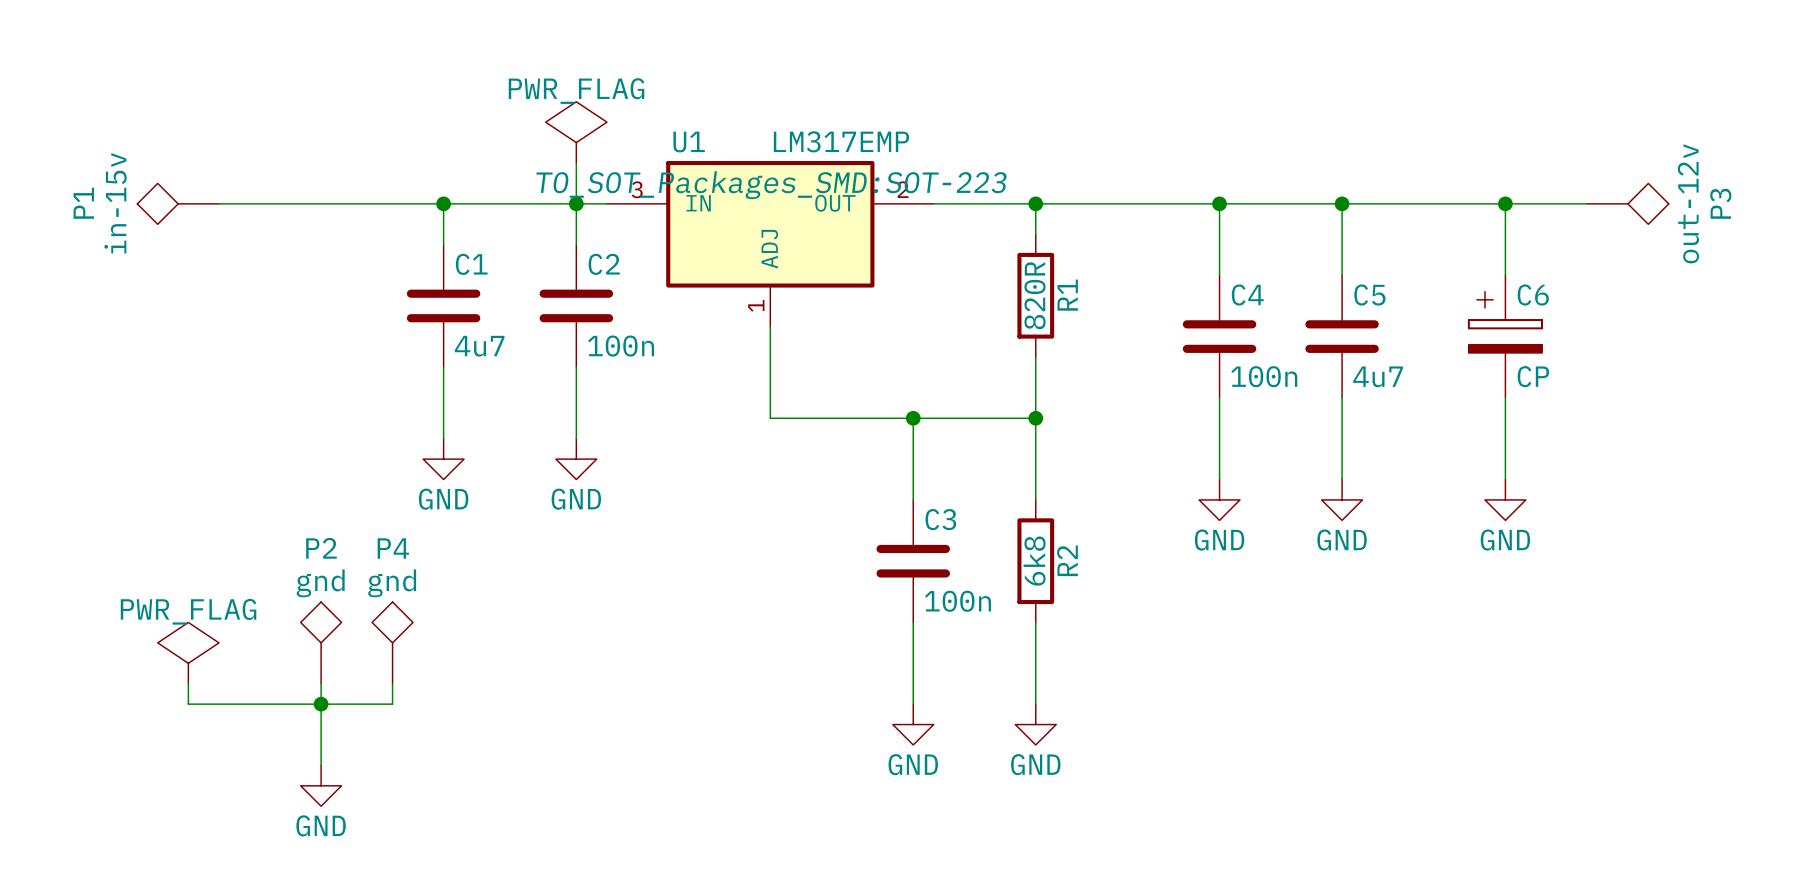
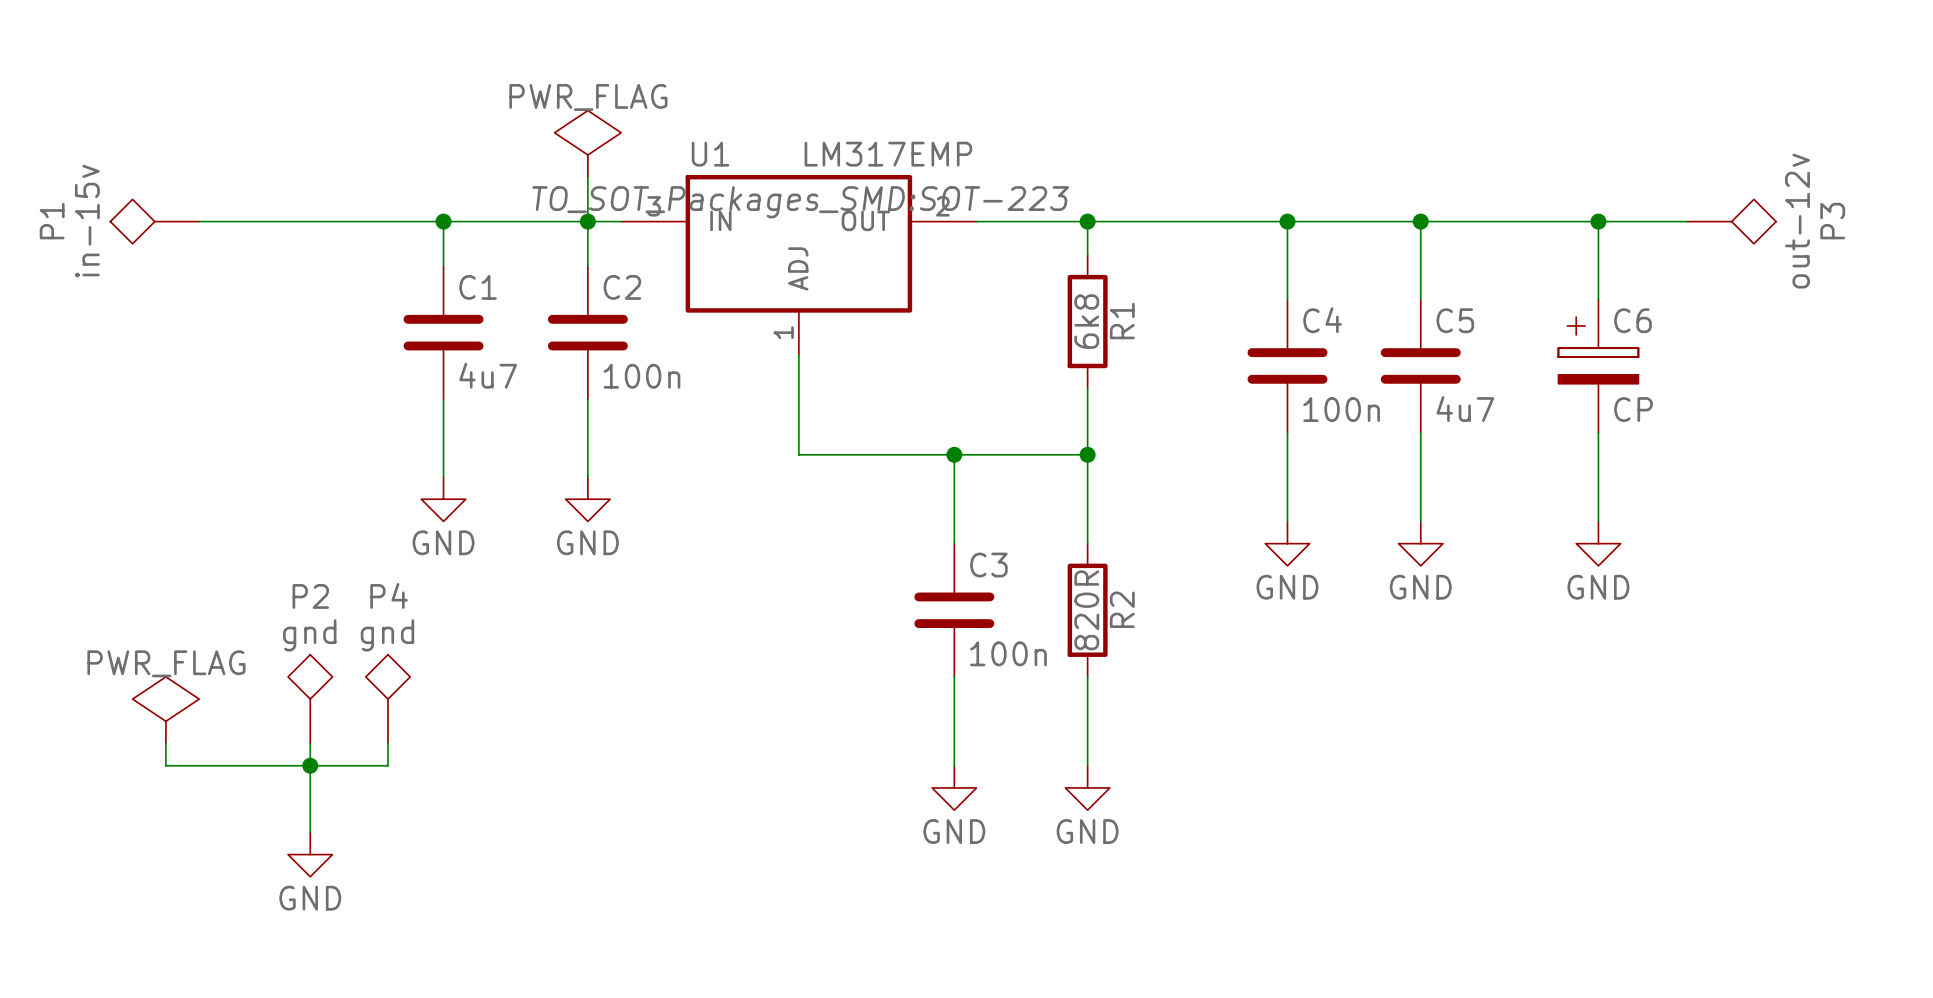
R1 value: 820R (1035, 295) -> 6k8 (1086, 321)
R2 value: 6k8 (1034, 561) -> 820R (1086, 610)

